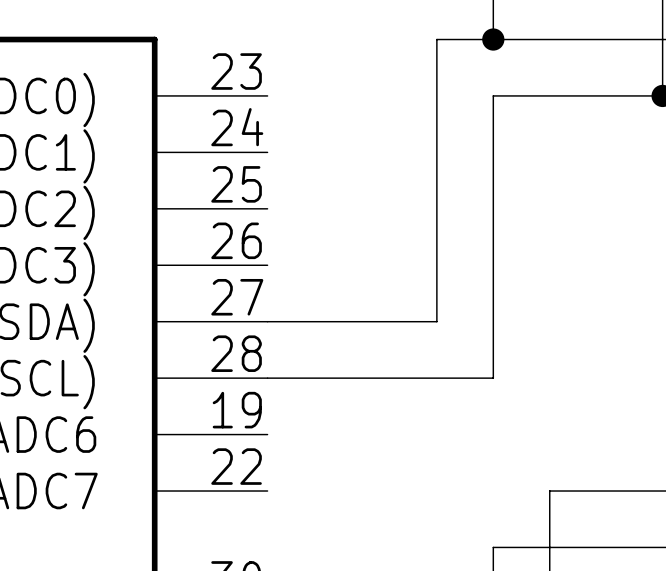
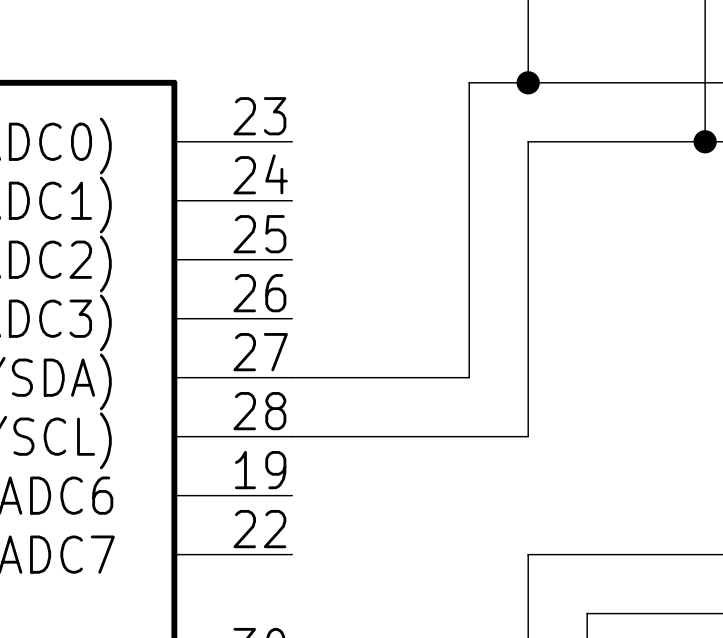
wire: (549, 491) (549, 547) (493, 547) -> (587, 554) (528, 554) (528, 613)

